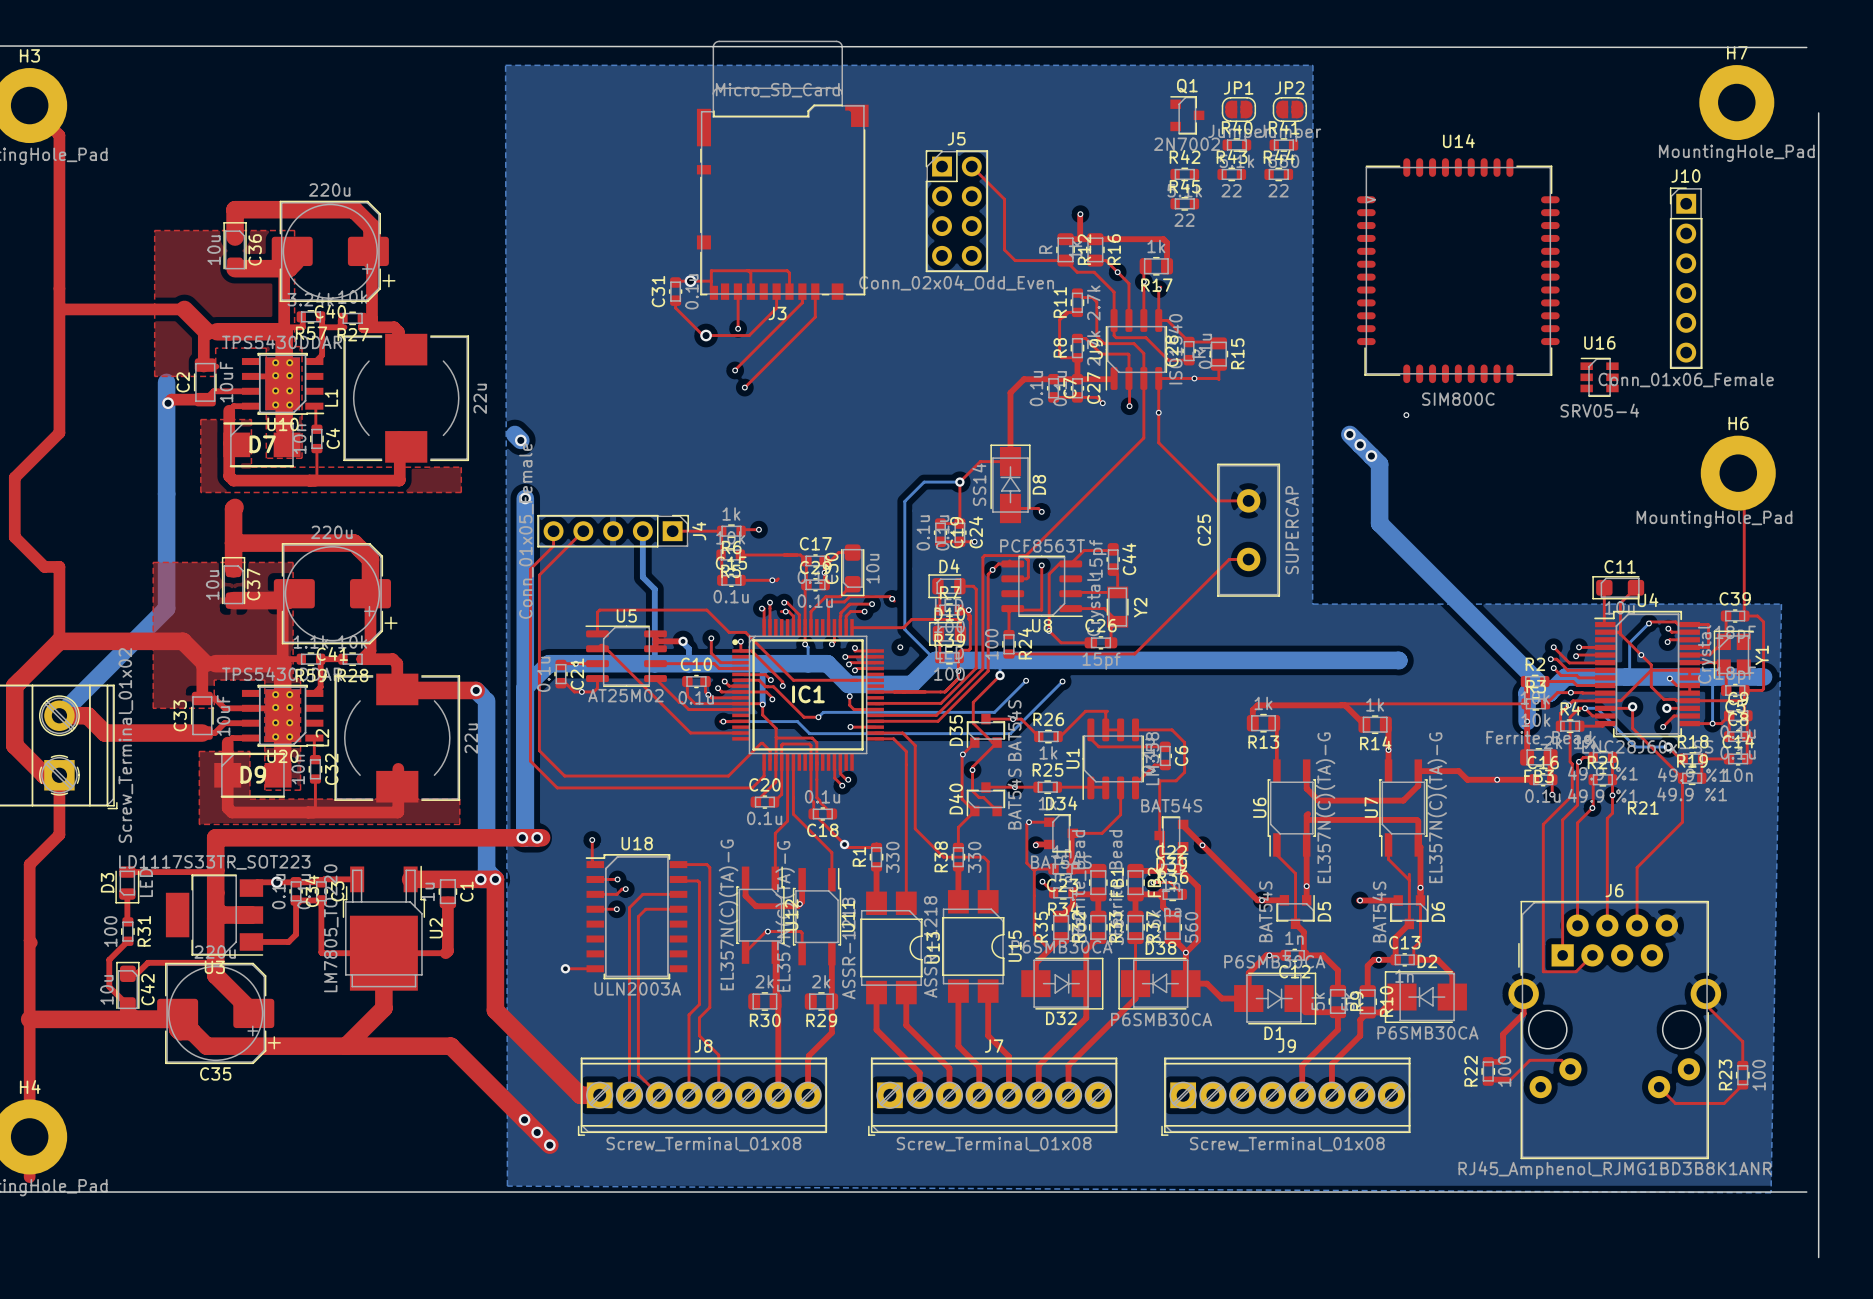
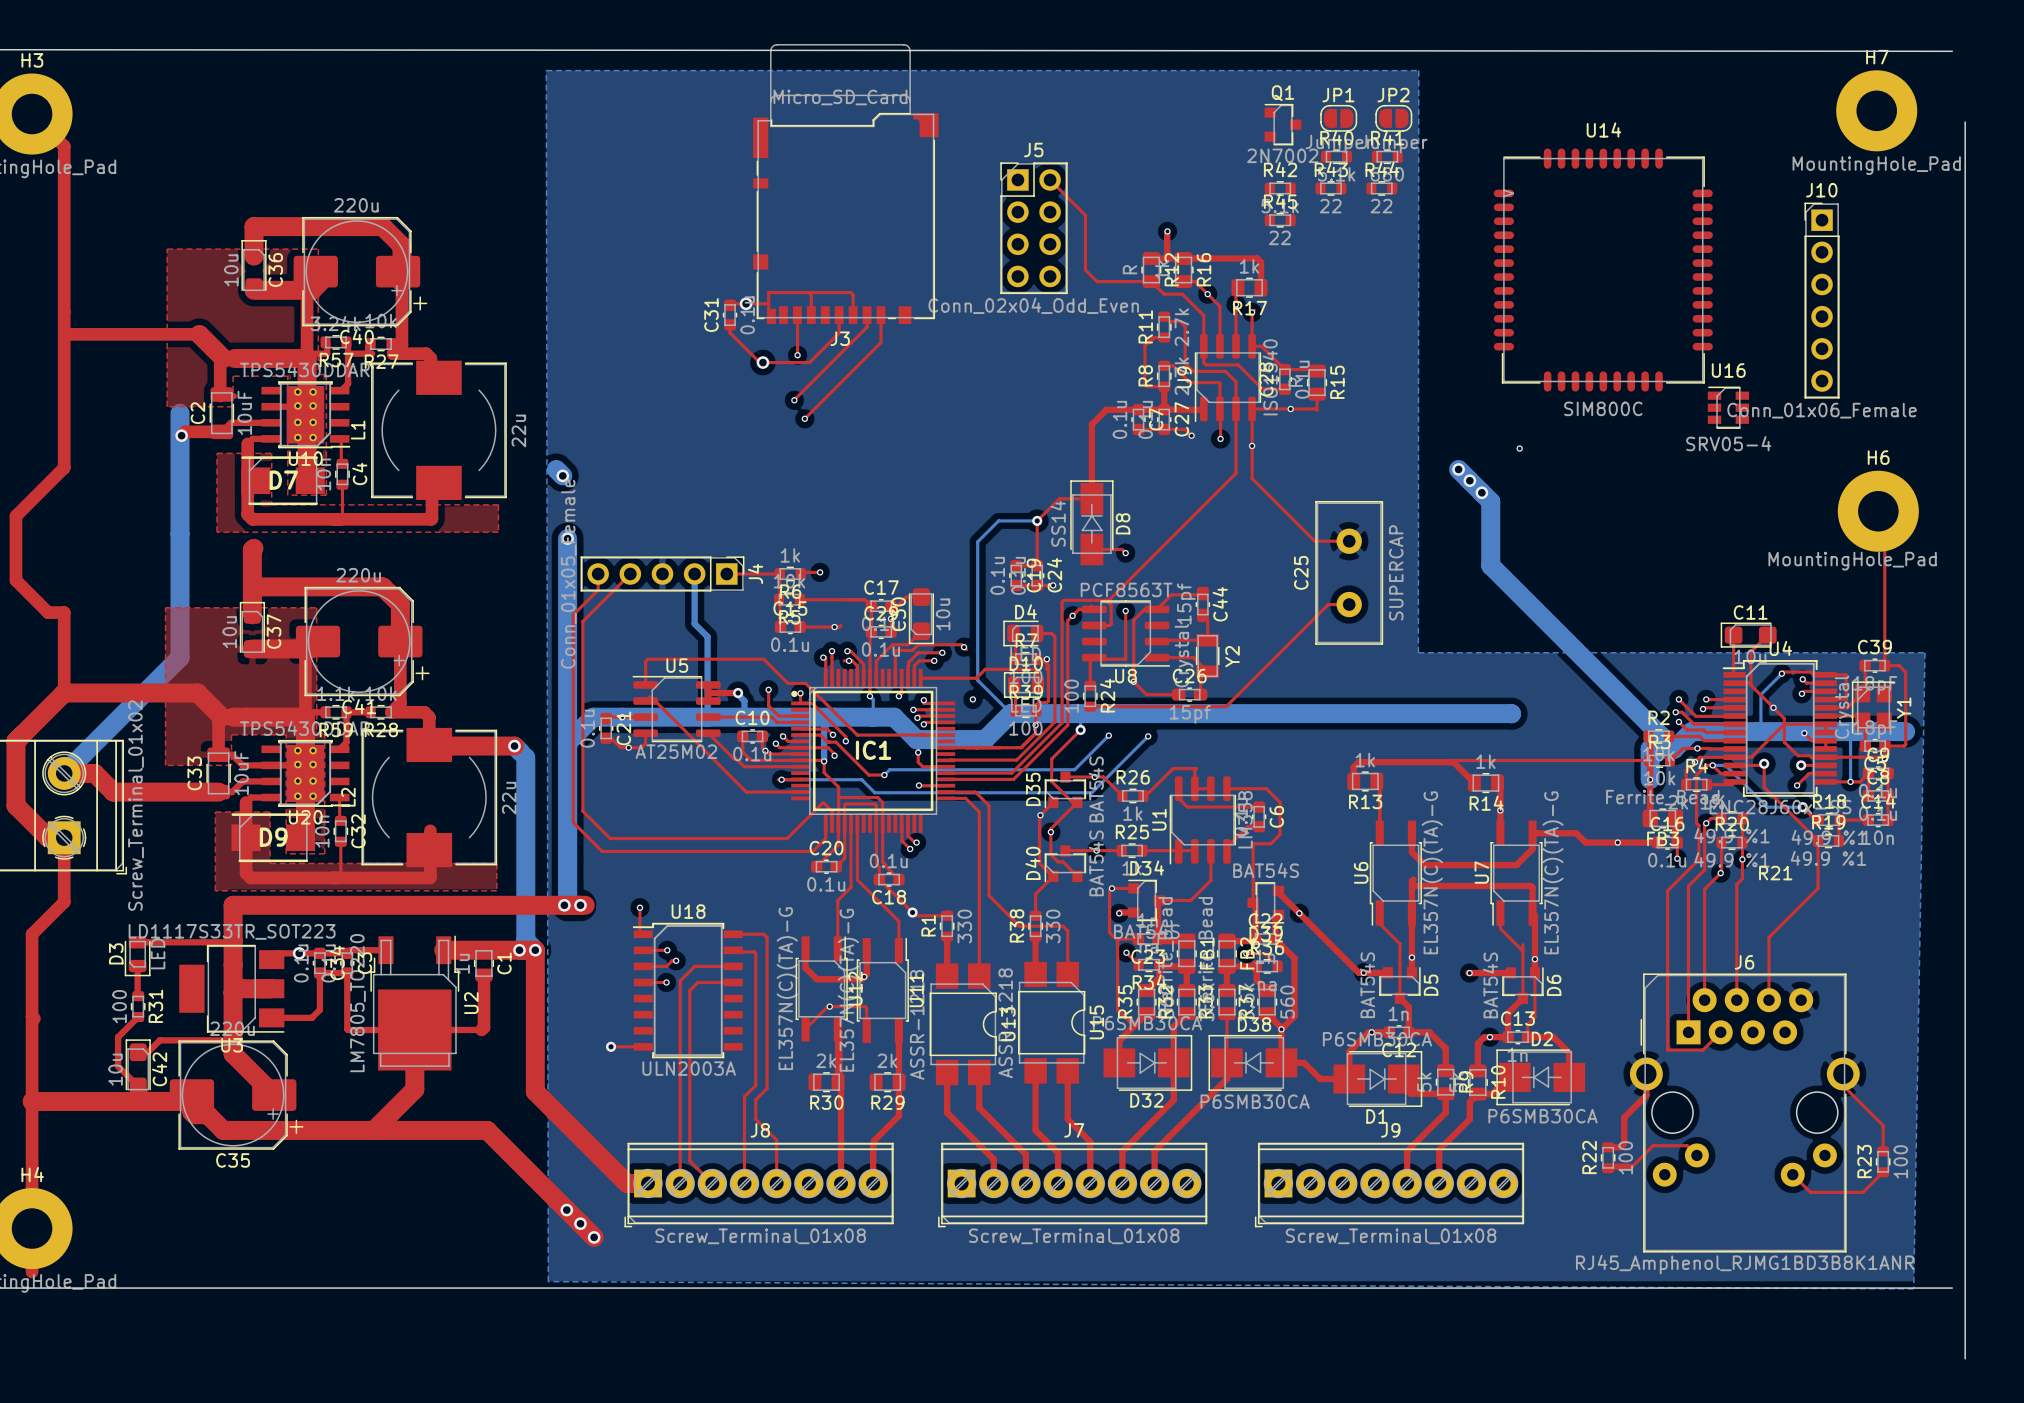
U14 position: (1458, 270) -> (1603, 270)

